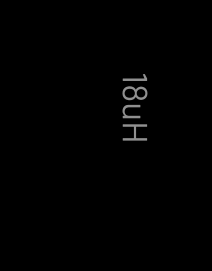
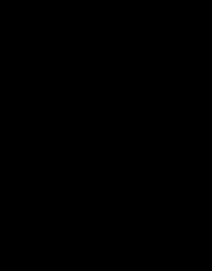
part: 18uH (134, 107) -> none

